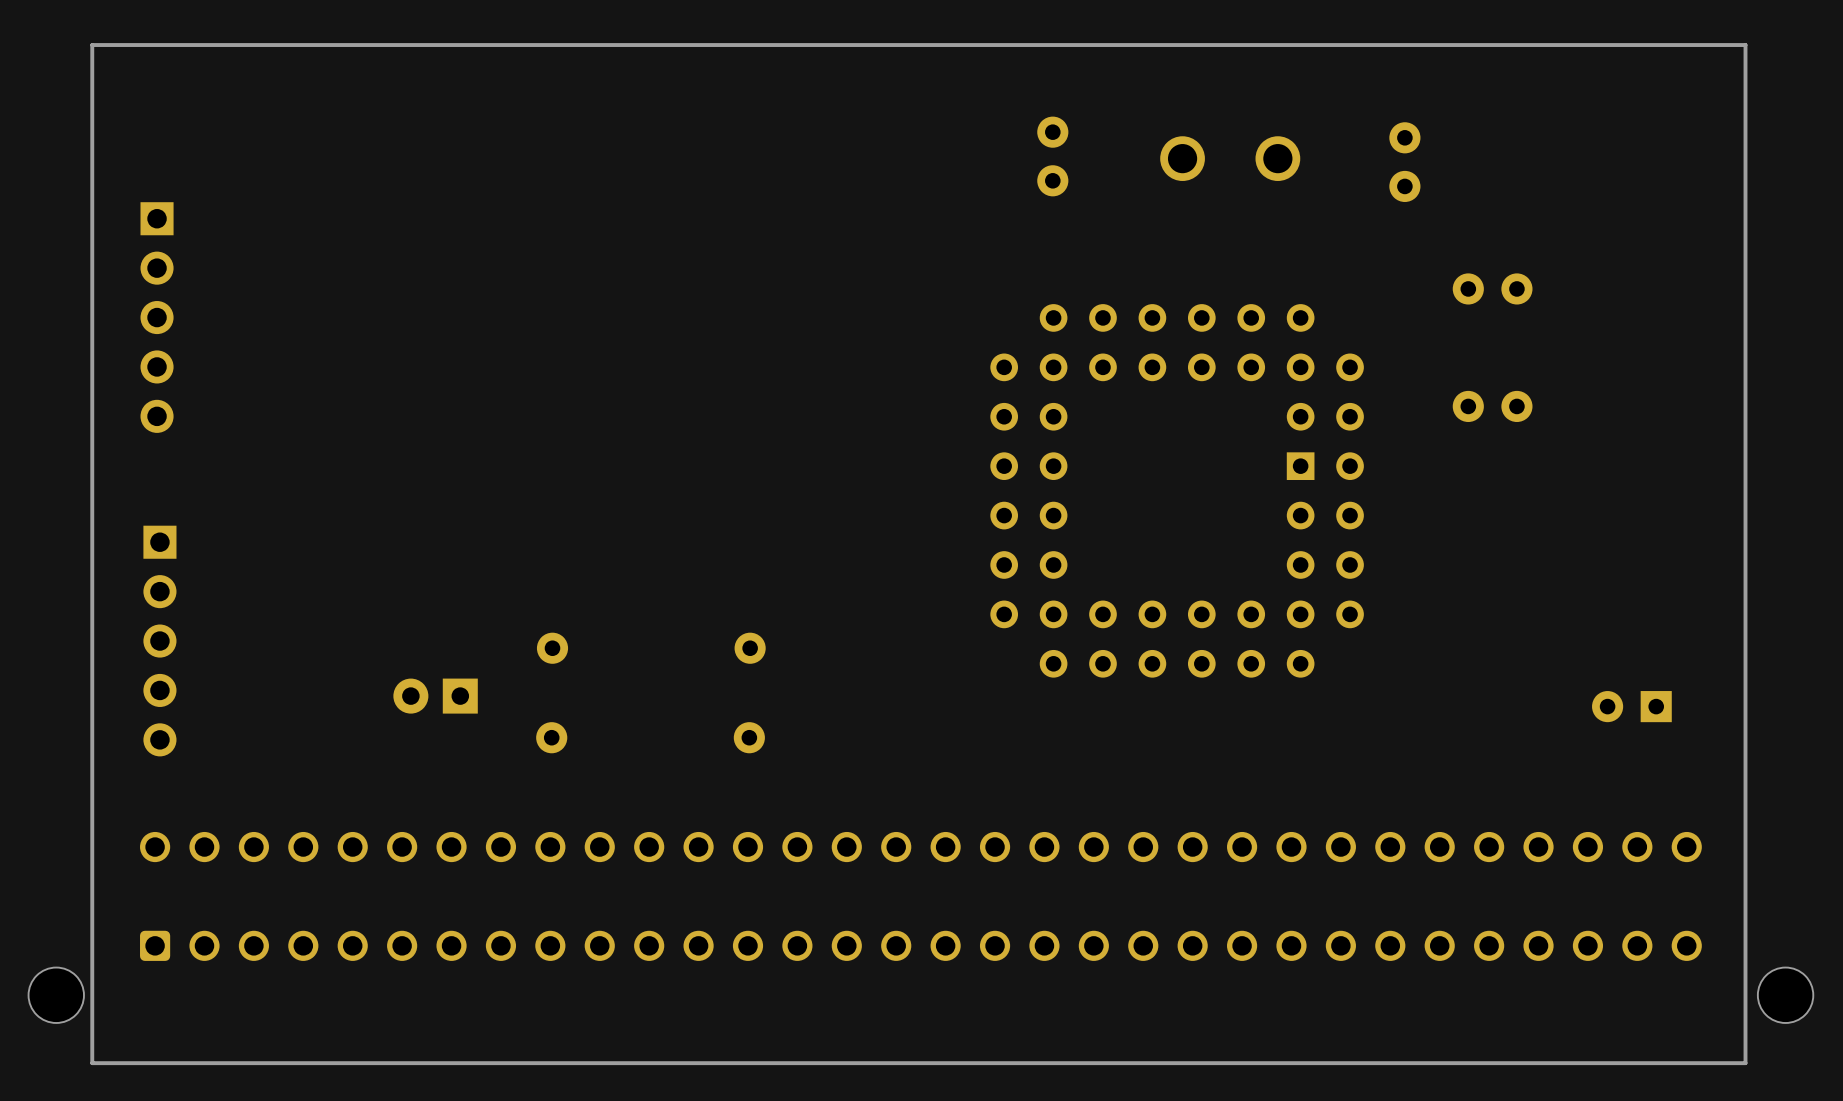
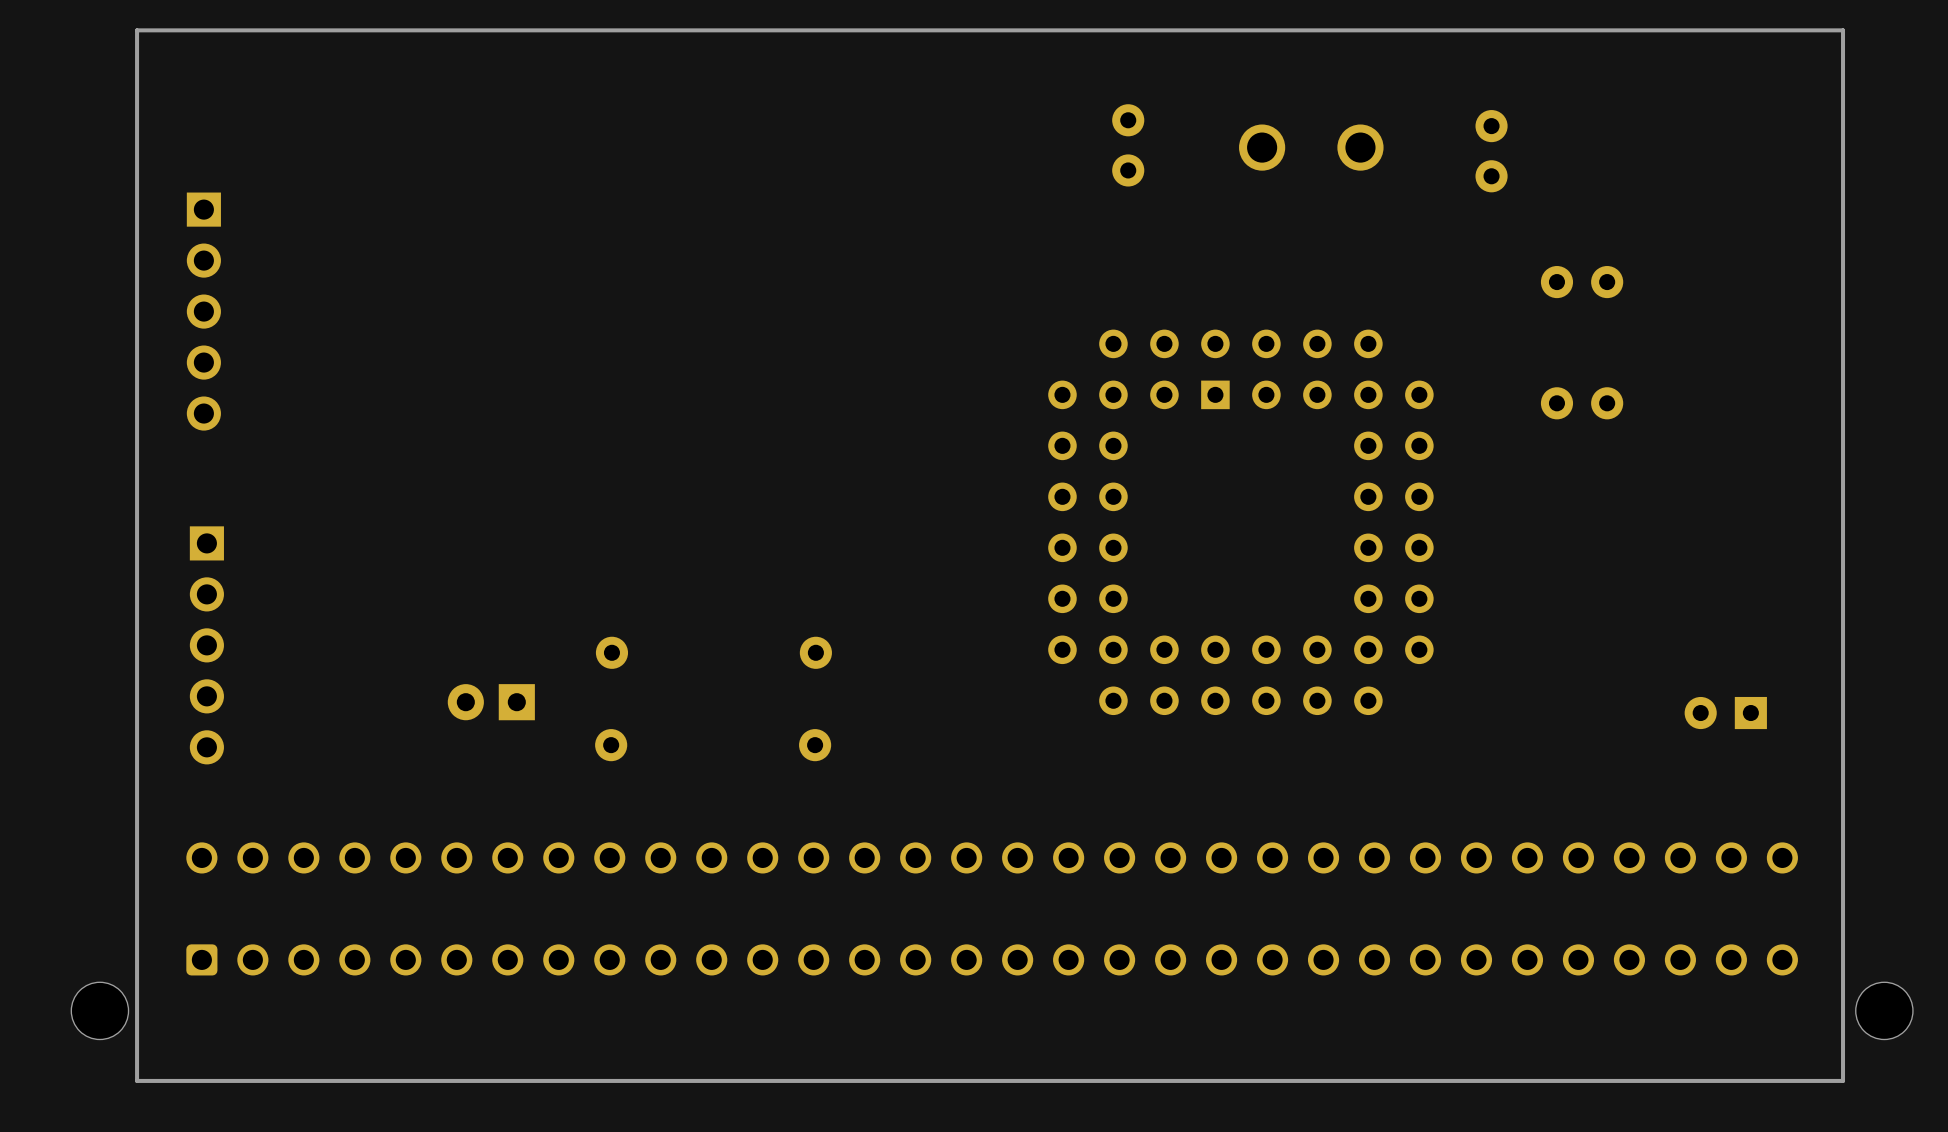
part rotation: 0° (1177, 490) -> 90° counterclockwise (1240, 522)

